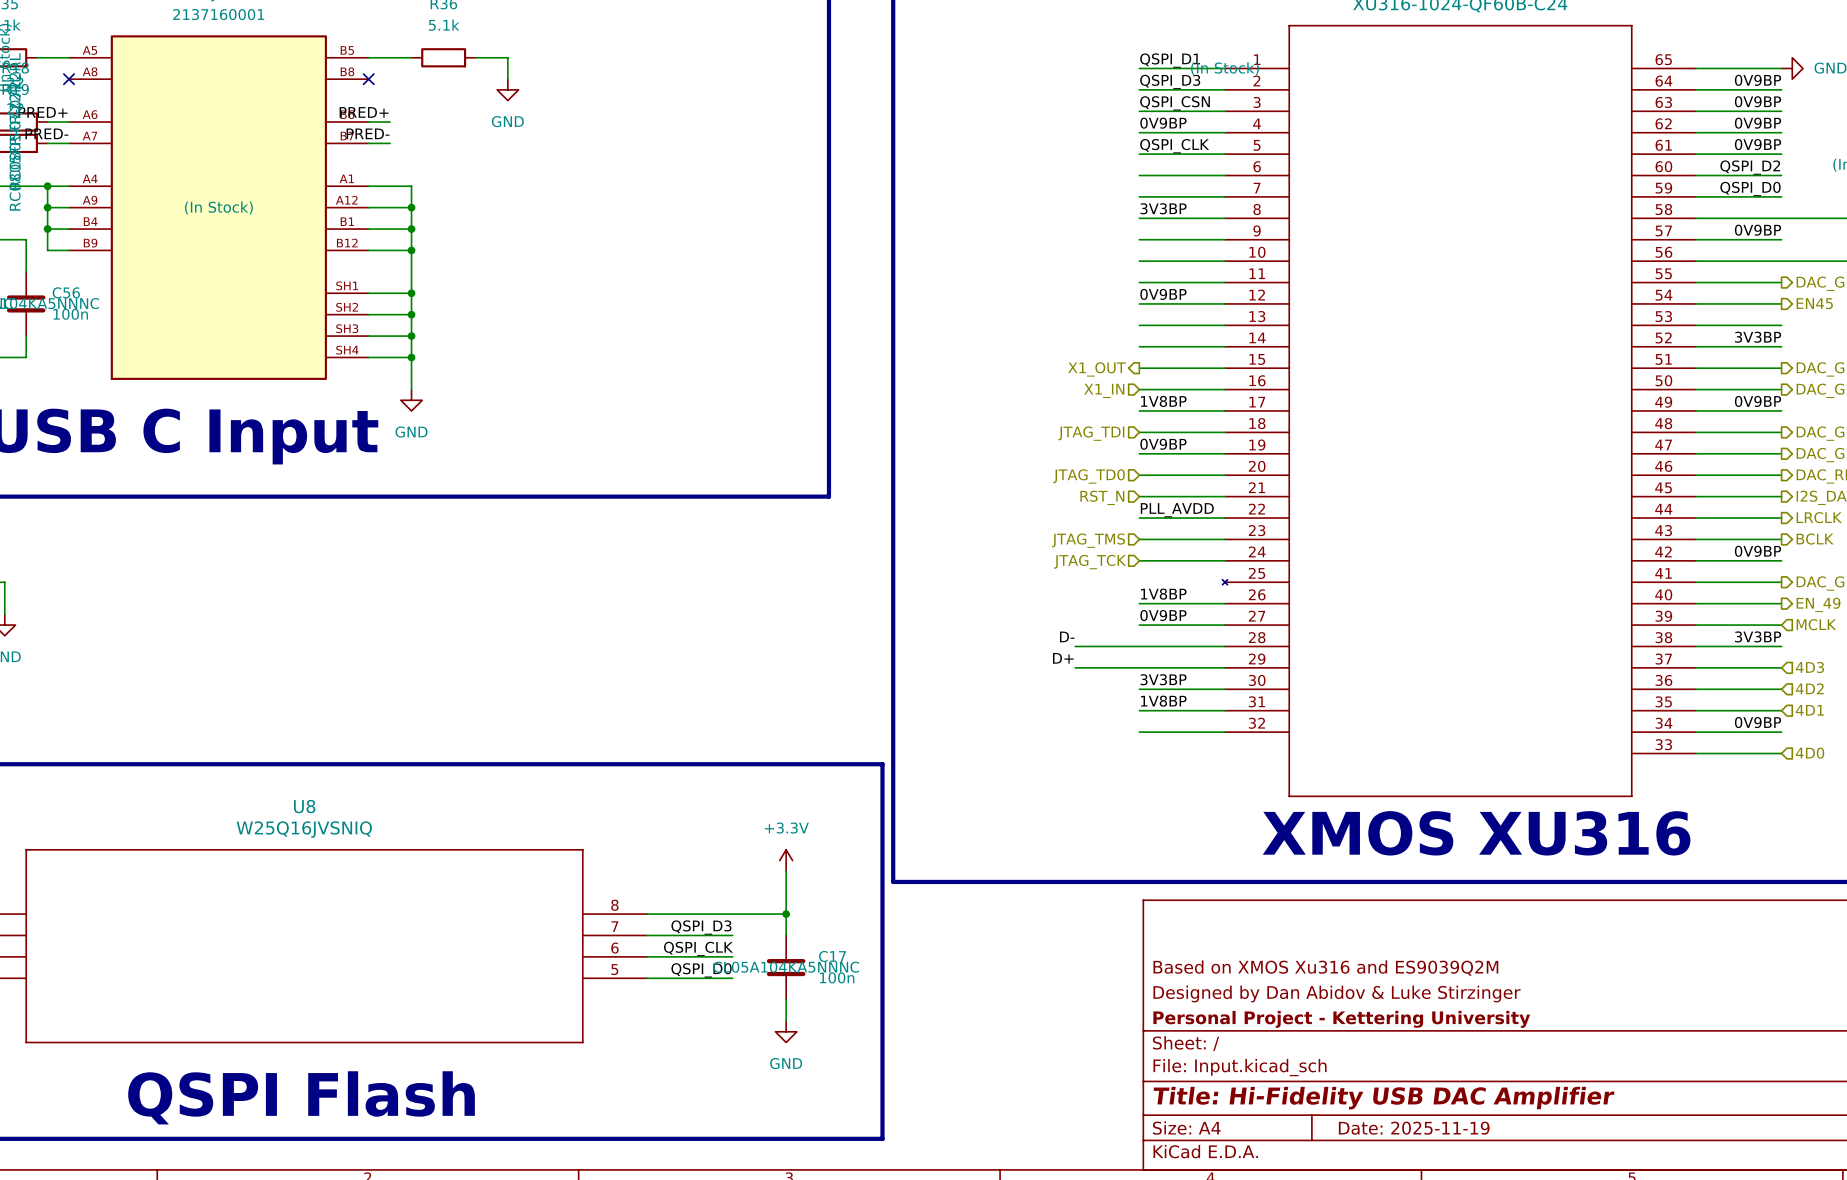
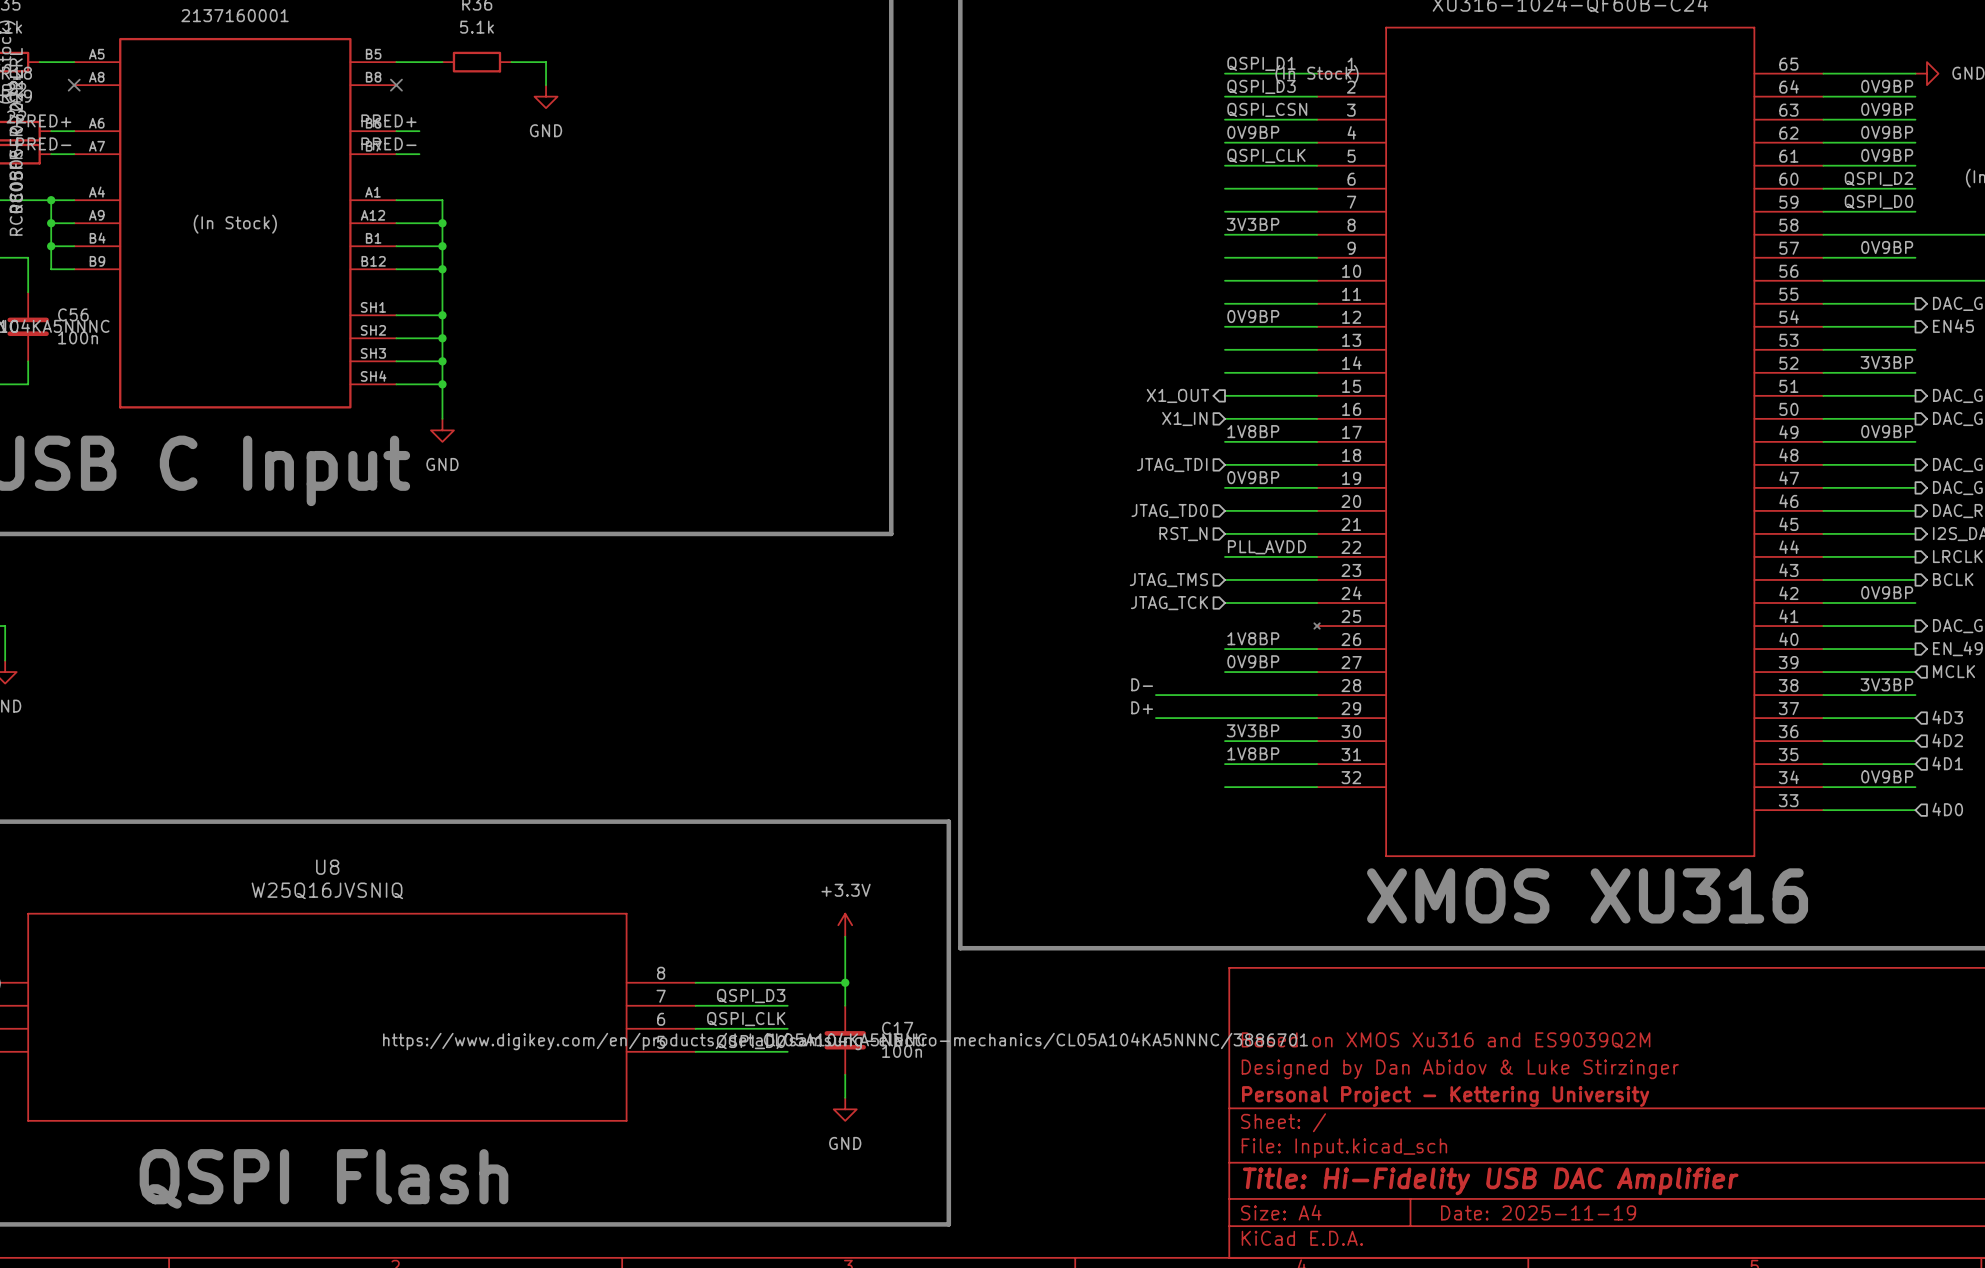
C17 text: none -> https://www.digikey.com/en/products/detail/samsung-electro-mechanics/CL05A104KA5NNNC/3886701 (845, 1041)

